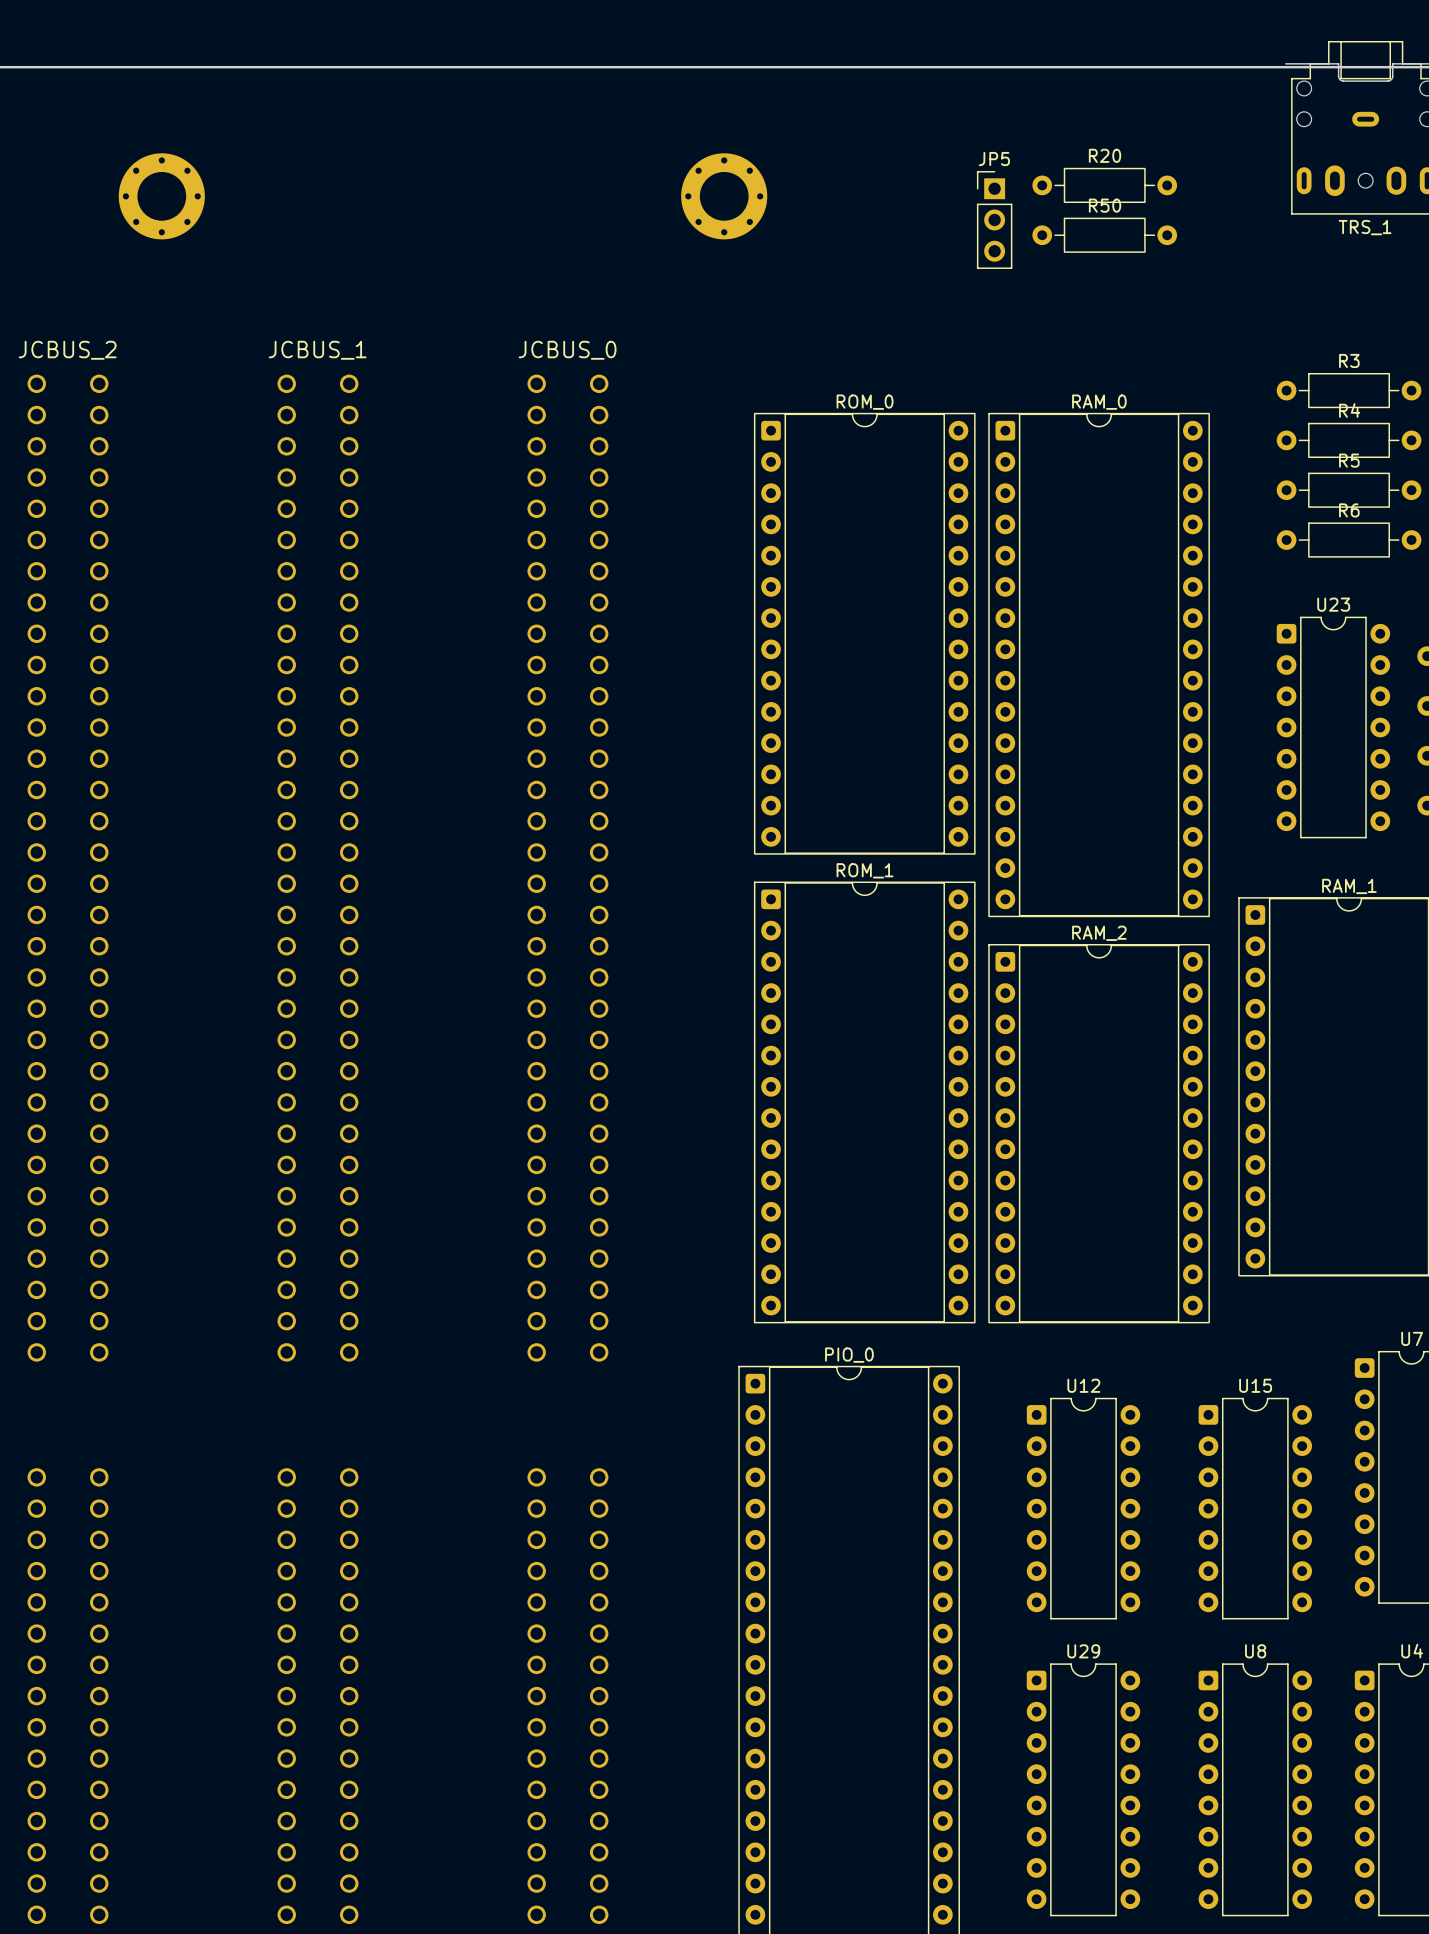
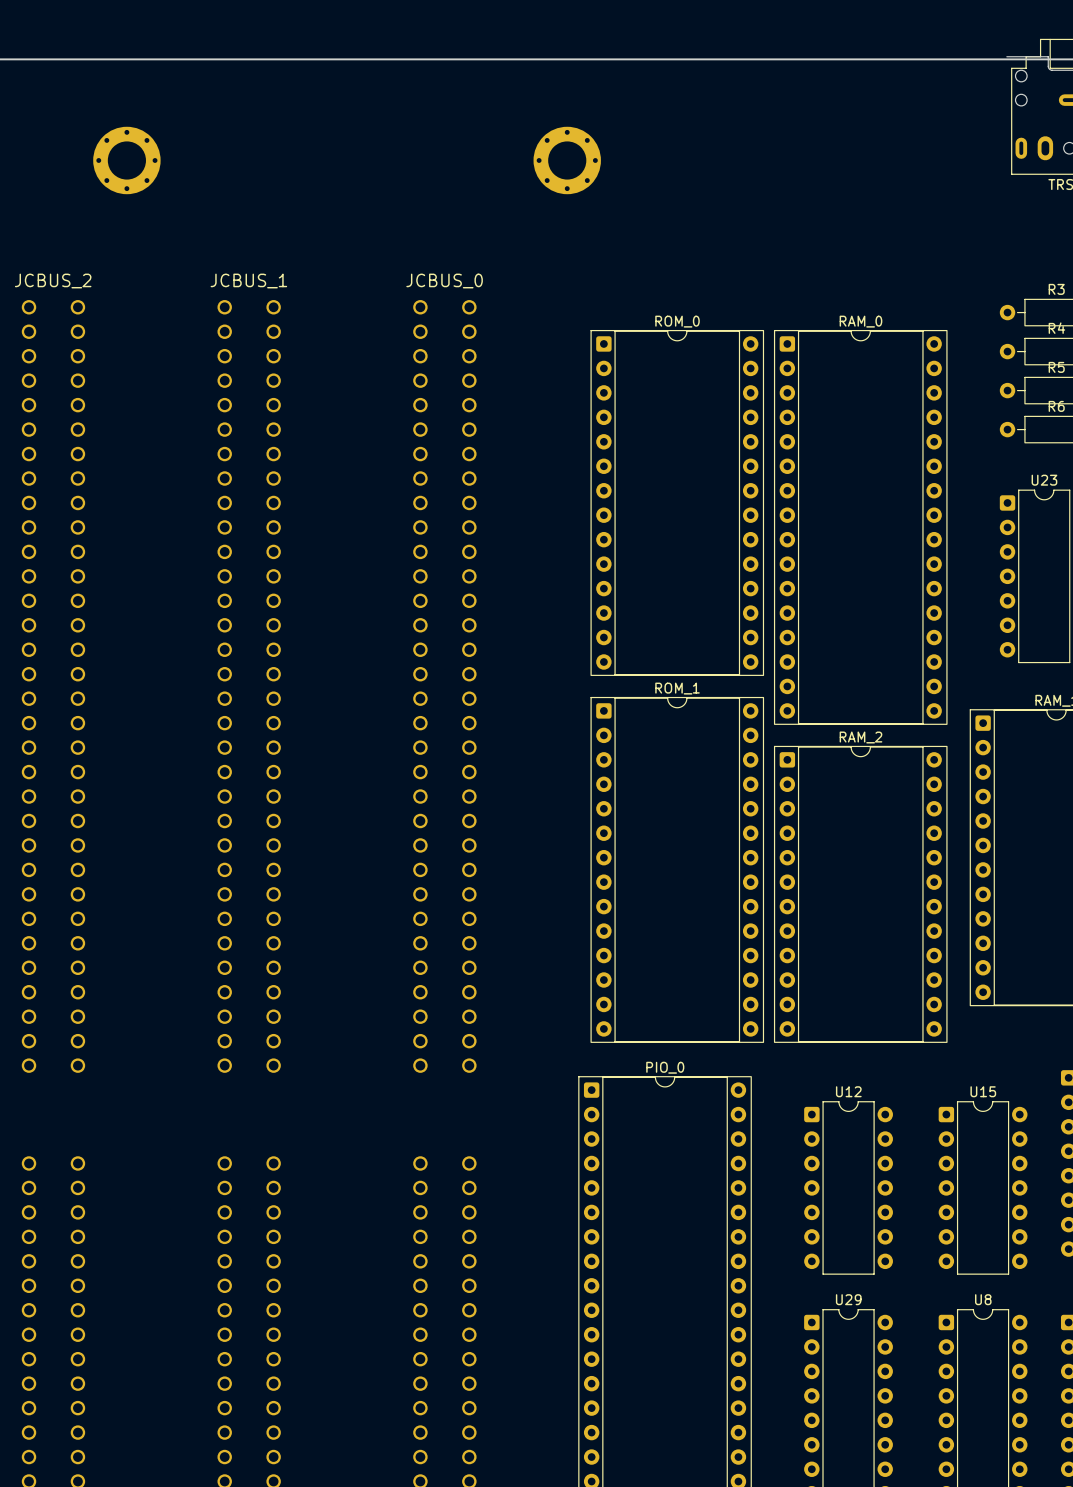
R20: (1104, 185) -> none
JP5: (994, 219) -> none
R50: (1104, 235) -> none

